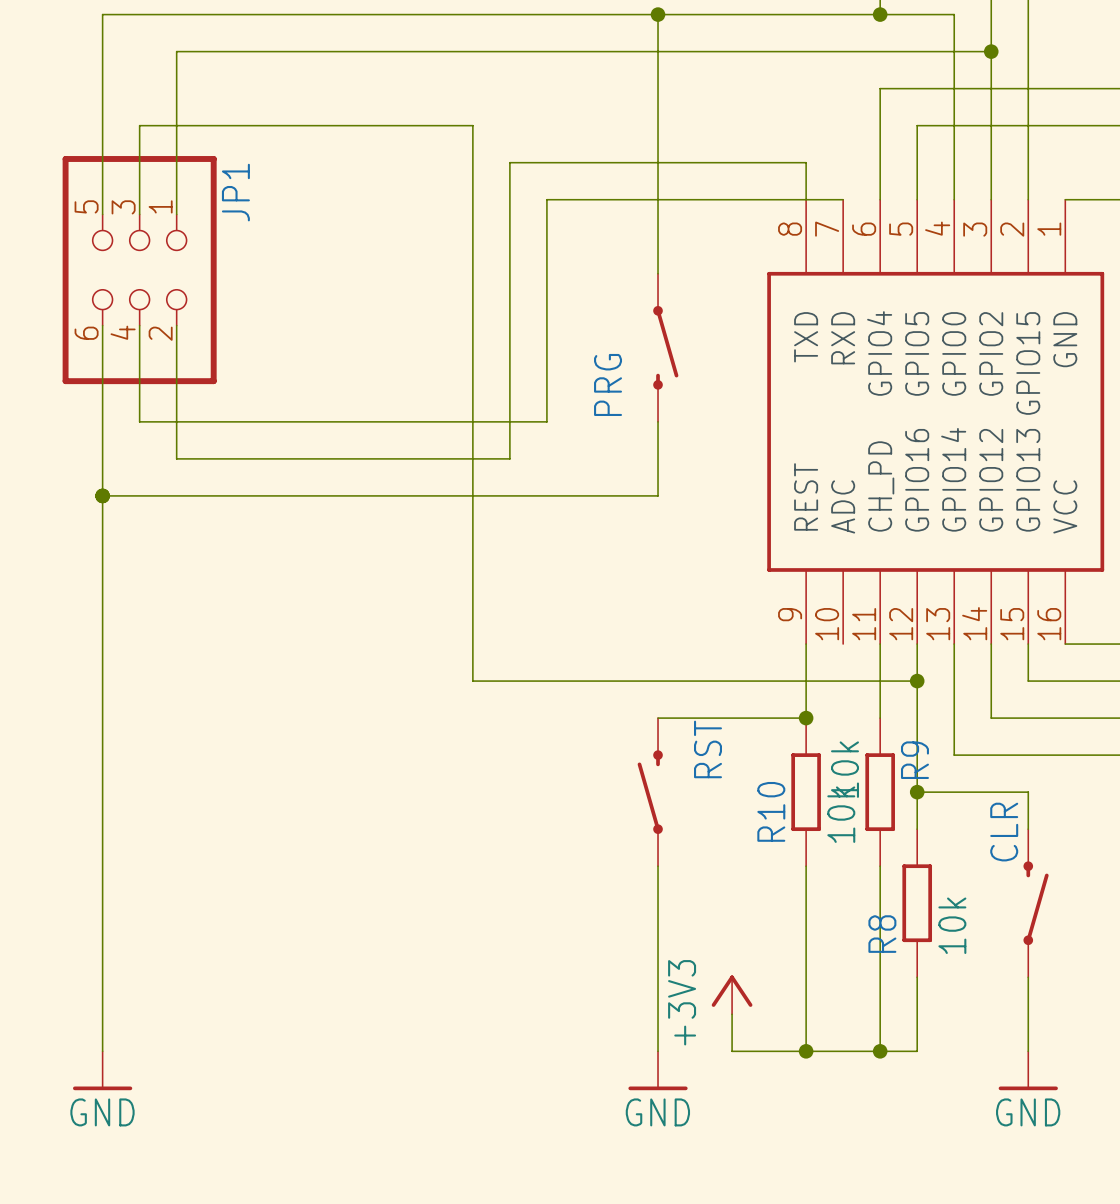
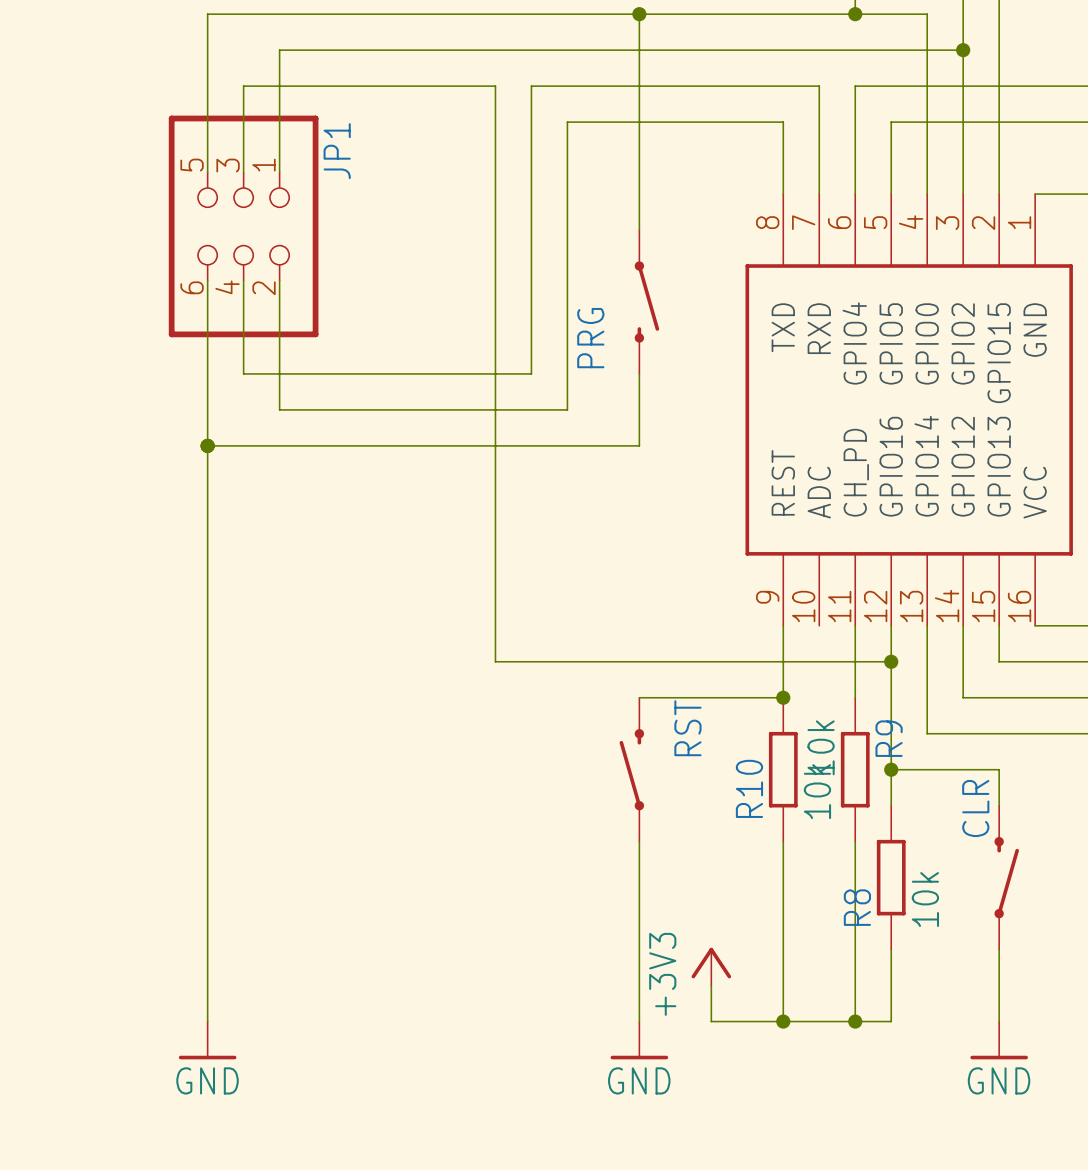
wire: (213, 14) (102, 14) (102, 214) -> (207, 14) (207, 172)
wire: (287, 51) (176, 51) (176, 214) -> (279, 50) (279, 172)
wire: (509, 162) (806, 162) -> (531, 409) (567, 409) (567, 122) (783, 122) (783, 158)
wire: none -> (495, 158) (495, 86) (243, 86) (243, 172)
wire: (546, 199) (843, 199) -> (531, 194) (531, 86) (819, 86) (819, 194)
wire: (139, 214) (139, 125) (472, 125) (472, 681) (509, 681) -> none
JP1 position: (139, 270) -> (243, 226)
wire: none -> (207, 280) (207, 1021)
wire: (102, 325) (102, 1051) -> none
wire: (139, 325) (139, 421) (287, 421) -> (279, 280) (279, 409)
wire: (176, 325) (176, 458) (213, 458) -> none
PRG position: (665, 347) -> (646, 302)
wire: (546, 384) (546, 421) -> (531, 373) (243, 373) (243, 280)
junction: none -> (207, 445)
wire: (658, 458) (658, 495) (102, 495) -> (639, 445) (495, 445) (495, 661)
junction: (102, 495) -> none
power symbol position: GND (102, 1070) -> GND (207, 1040)

